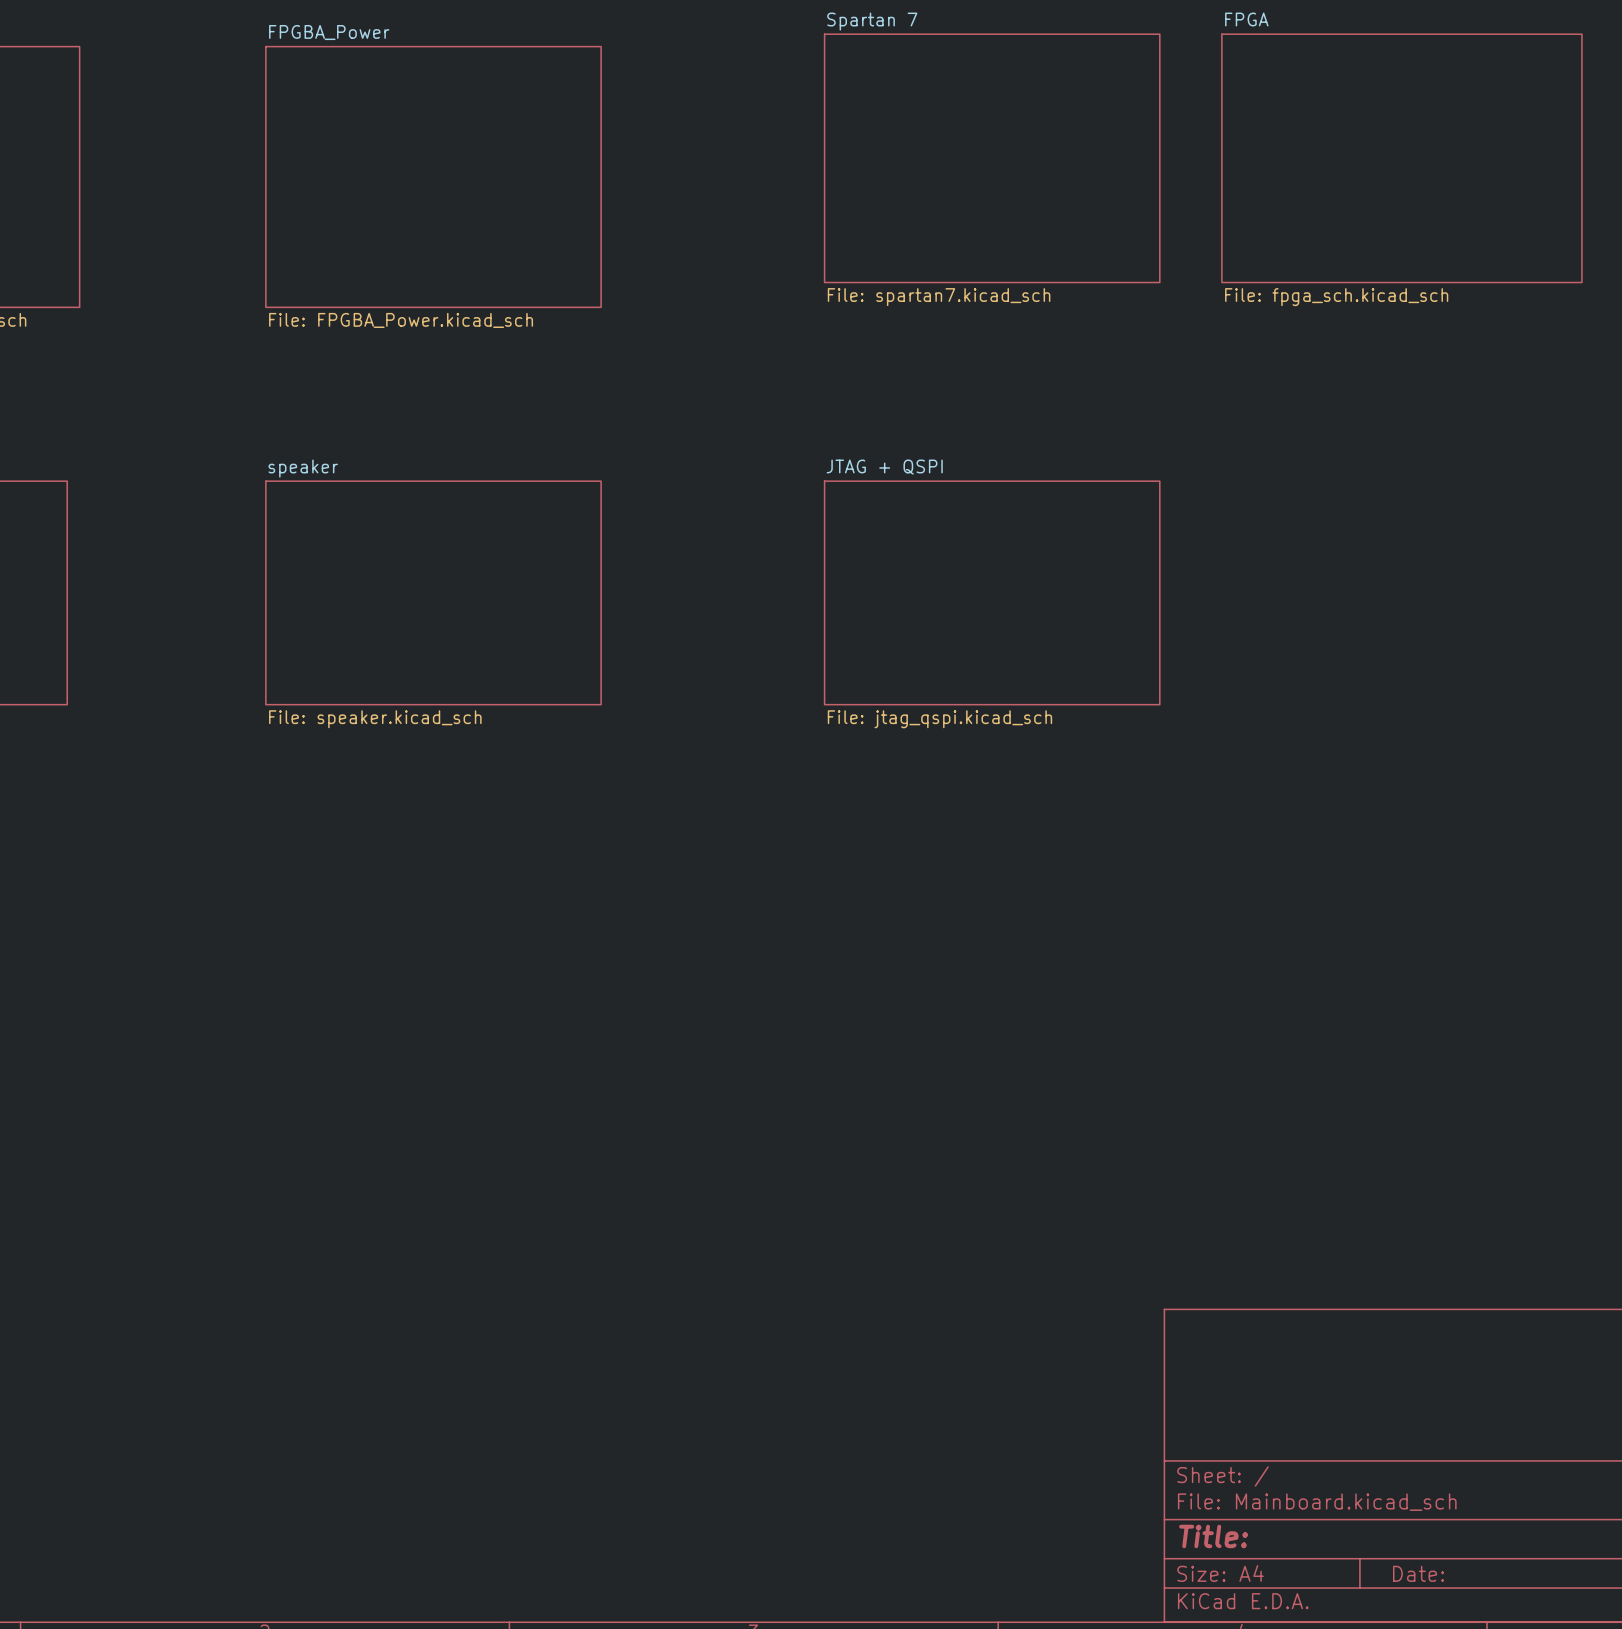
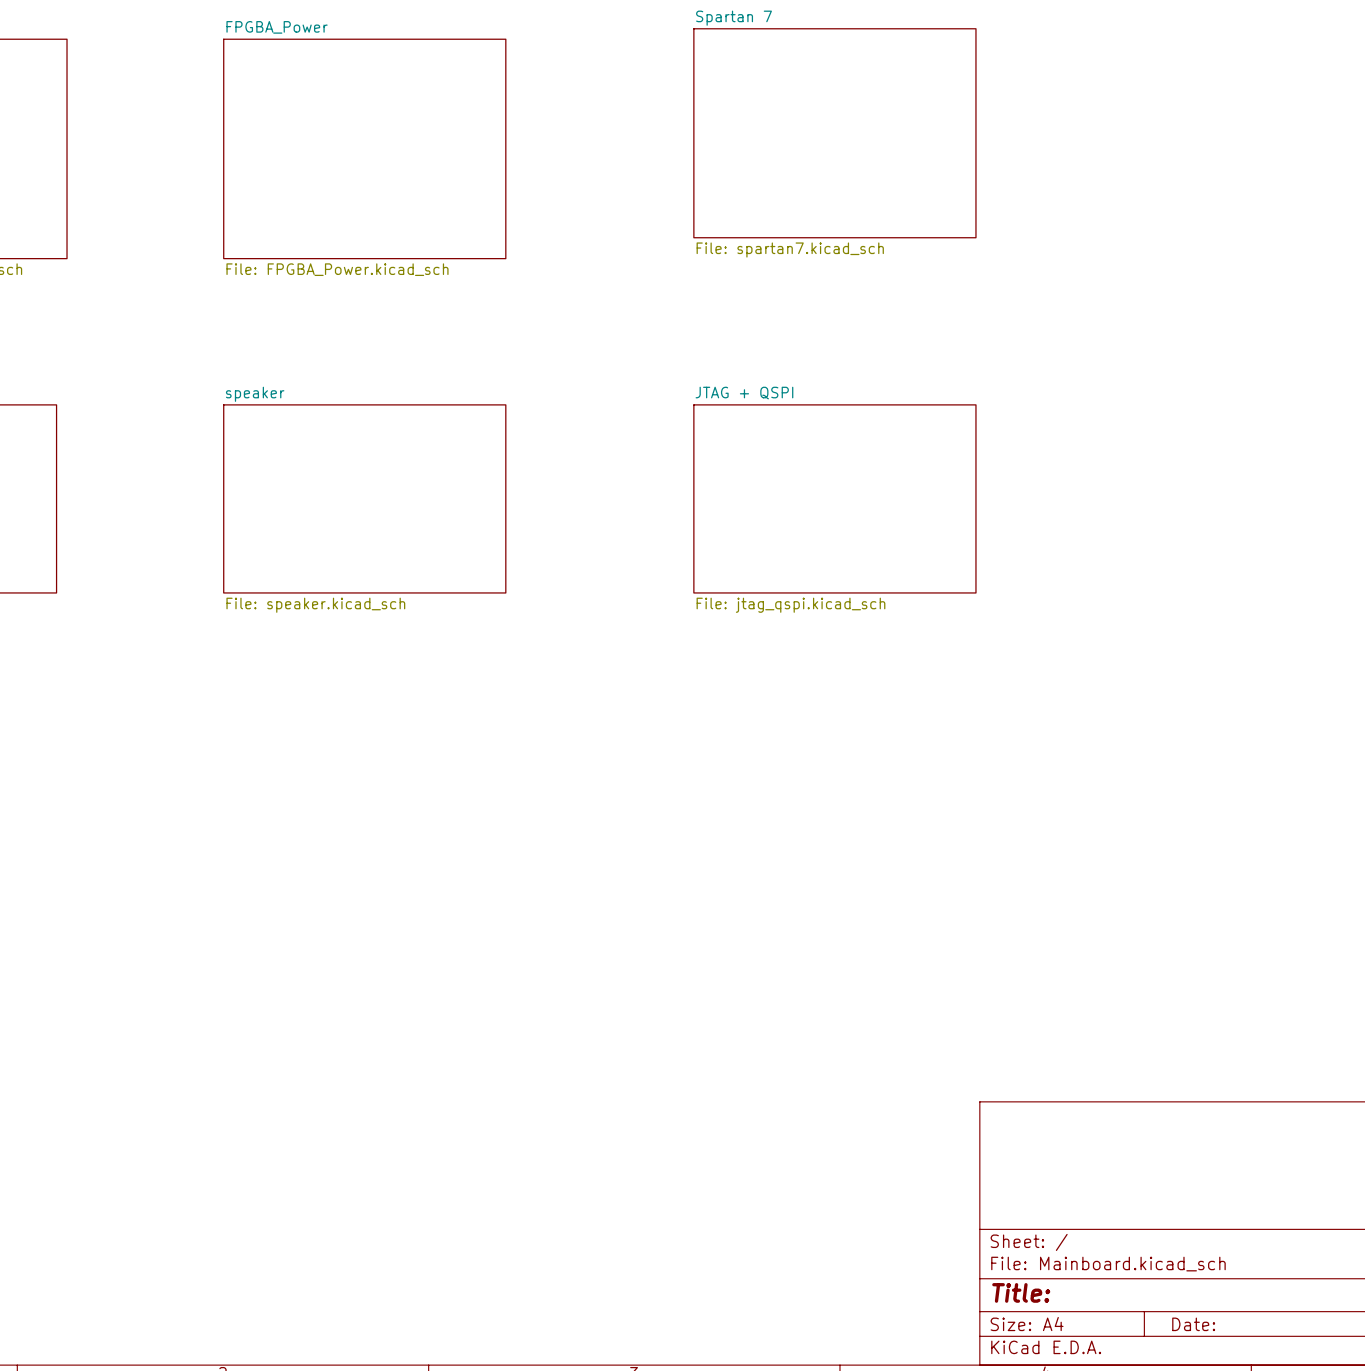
sheet FPGA: File: fpga_sch.kicad_sch (1401, 158) -> none

